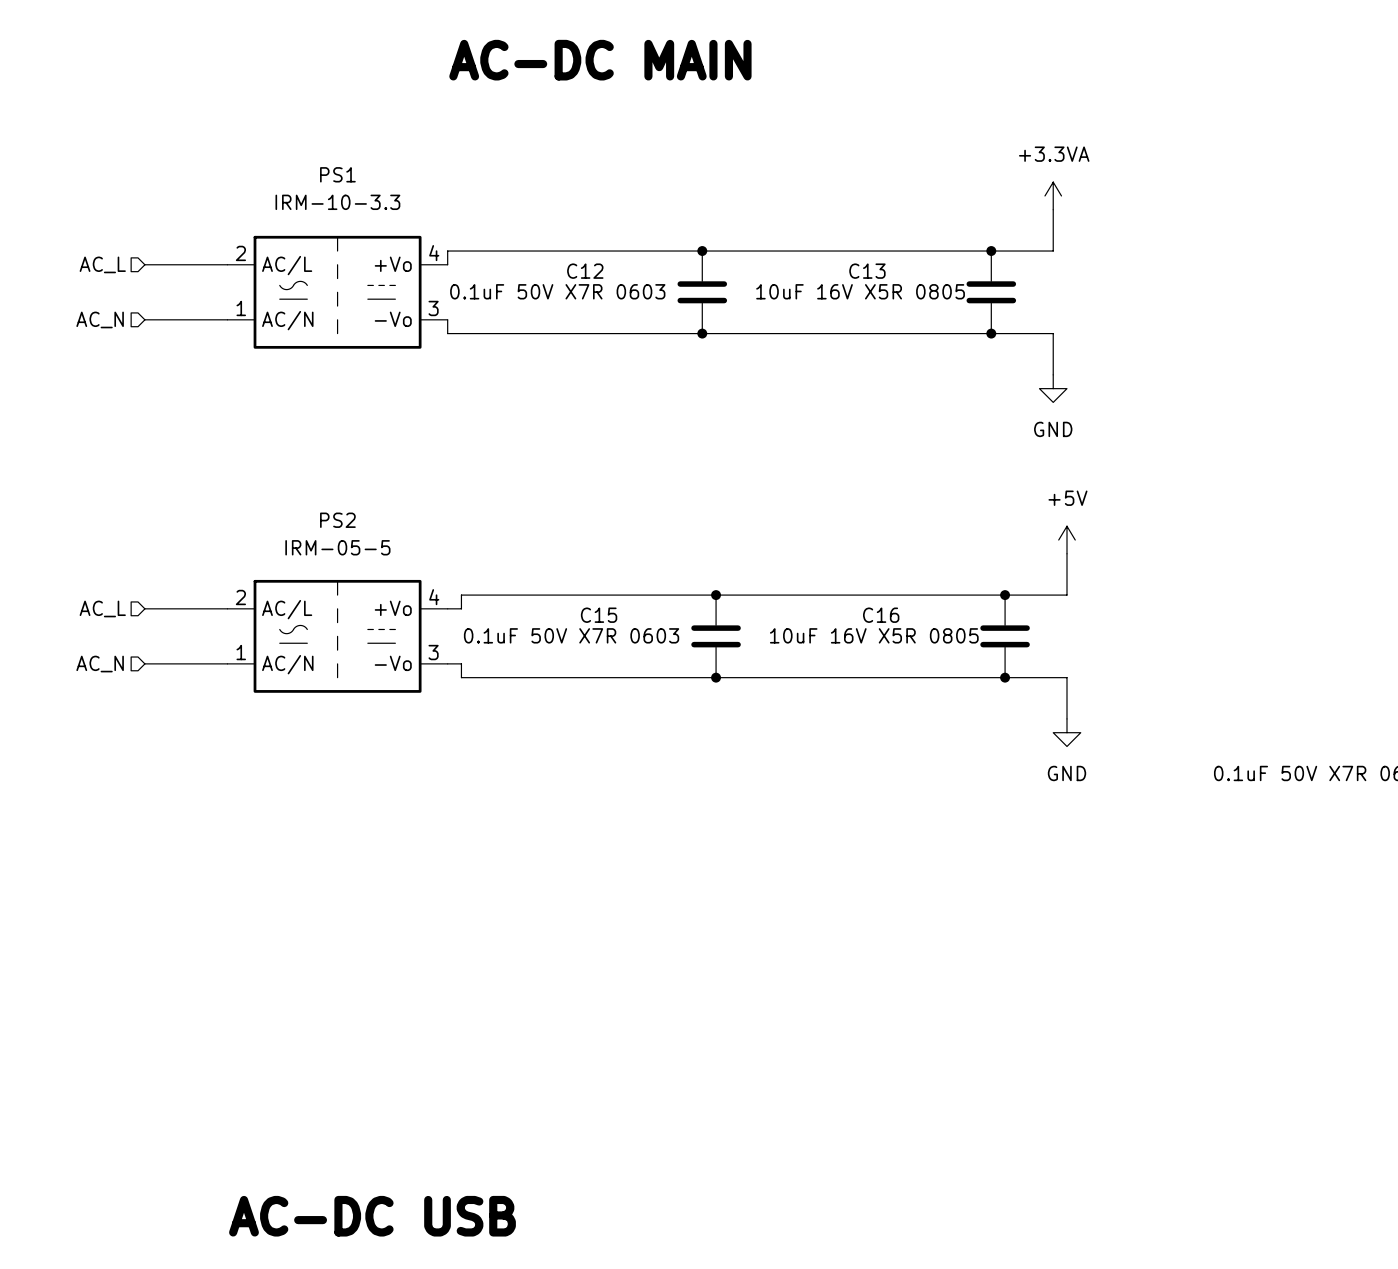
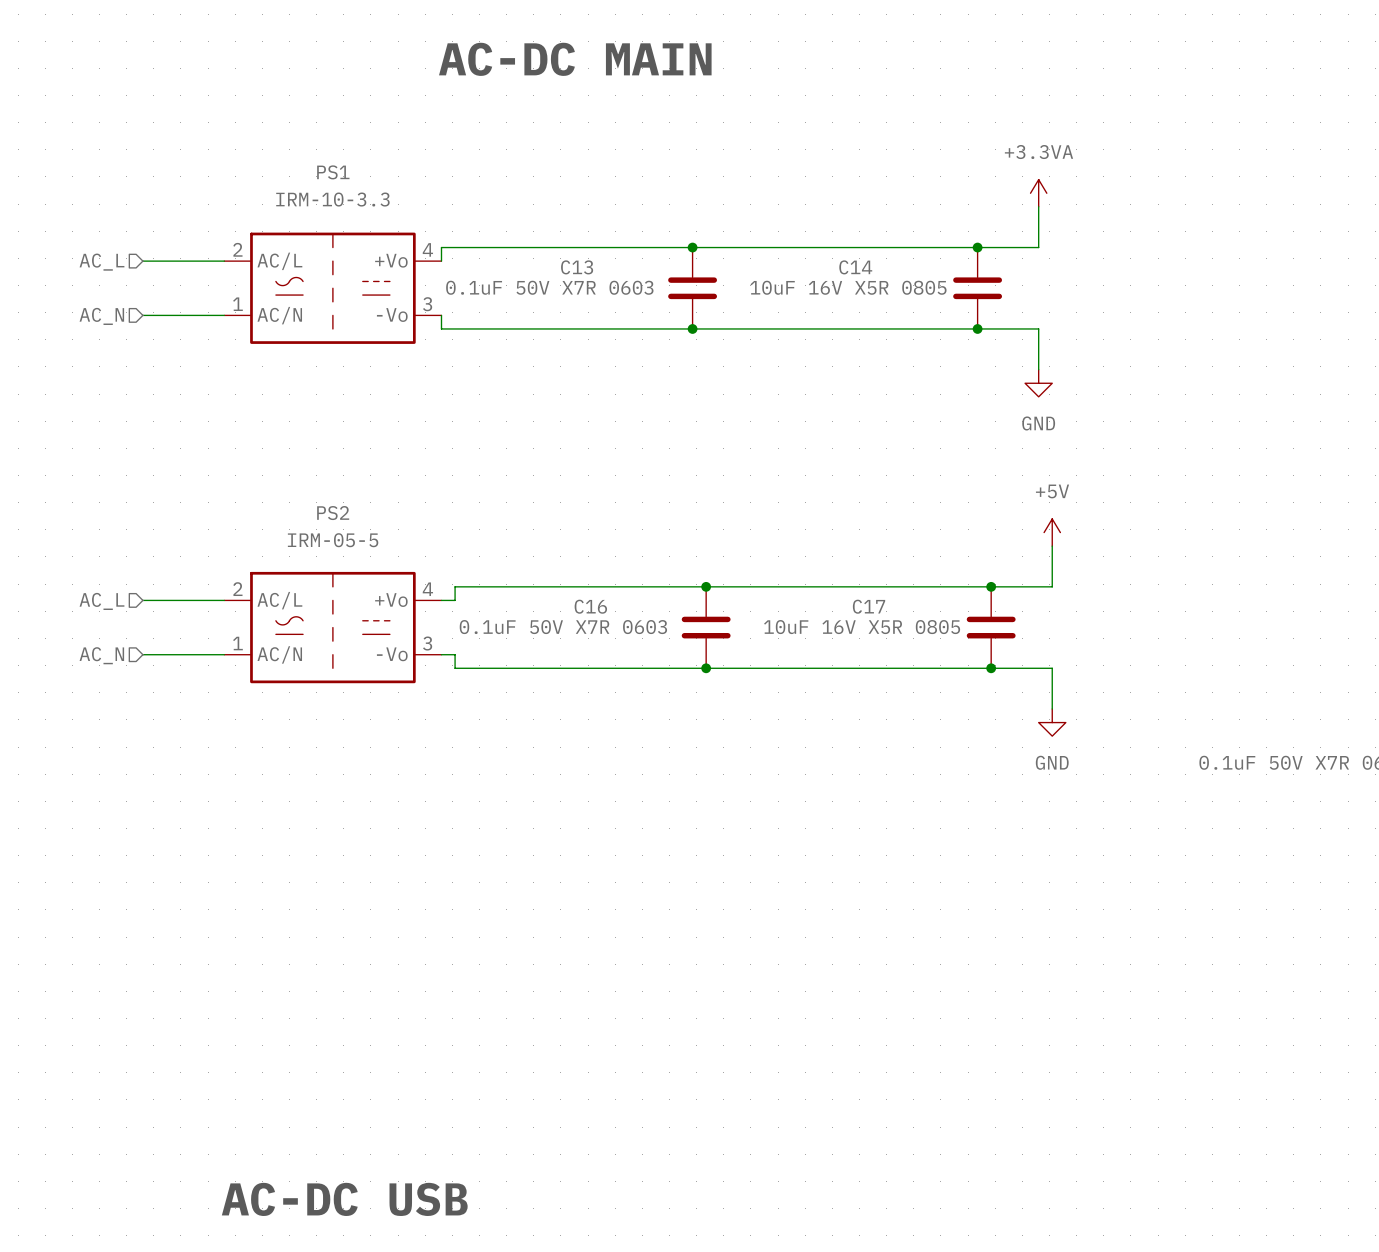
C12 name: C12 (585, 271) -> C13 (577, 267)
C13 name: C13 (867, 271) -> C14 (855, 267)
C15 name: C15 (599, 615) -> C16 (590, 606)
C16 name: C16 (881, 615) -> C17 (869, 606)

